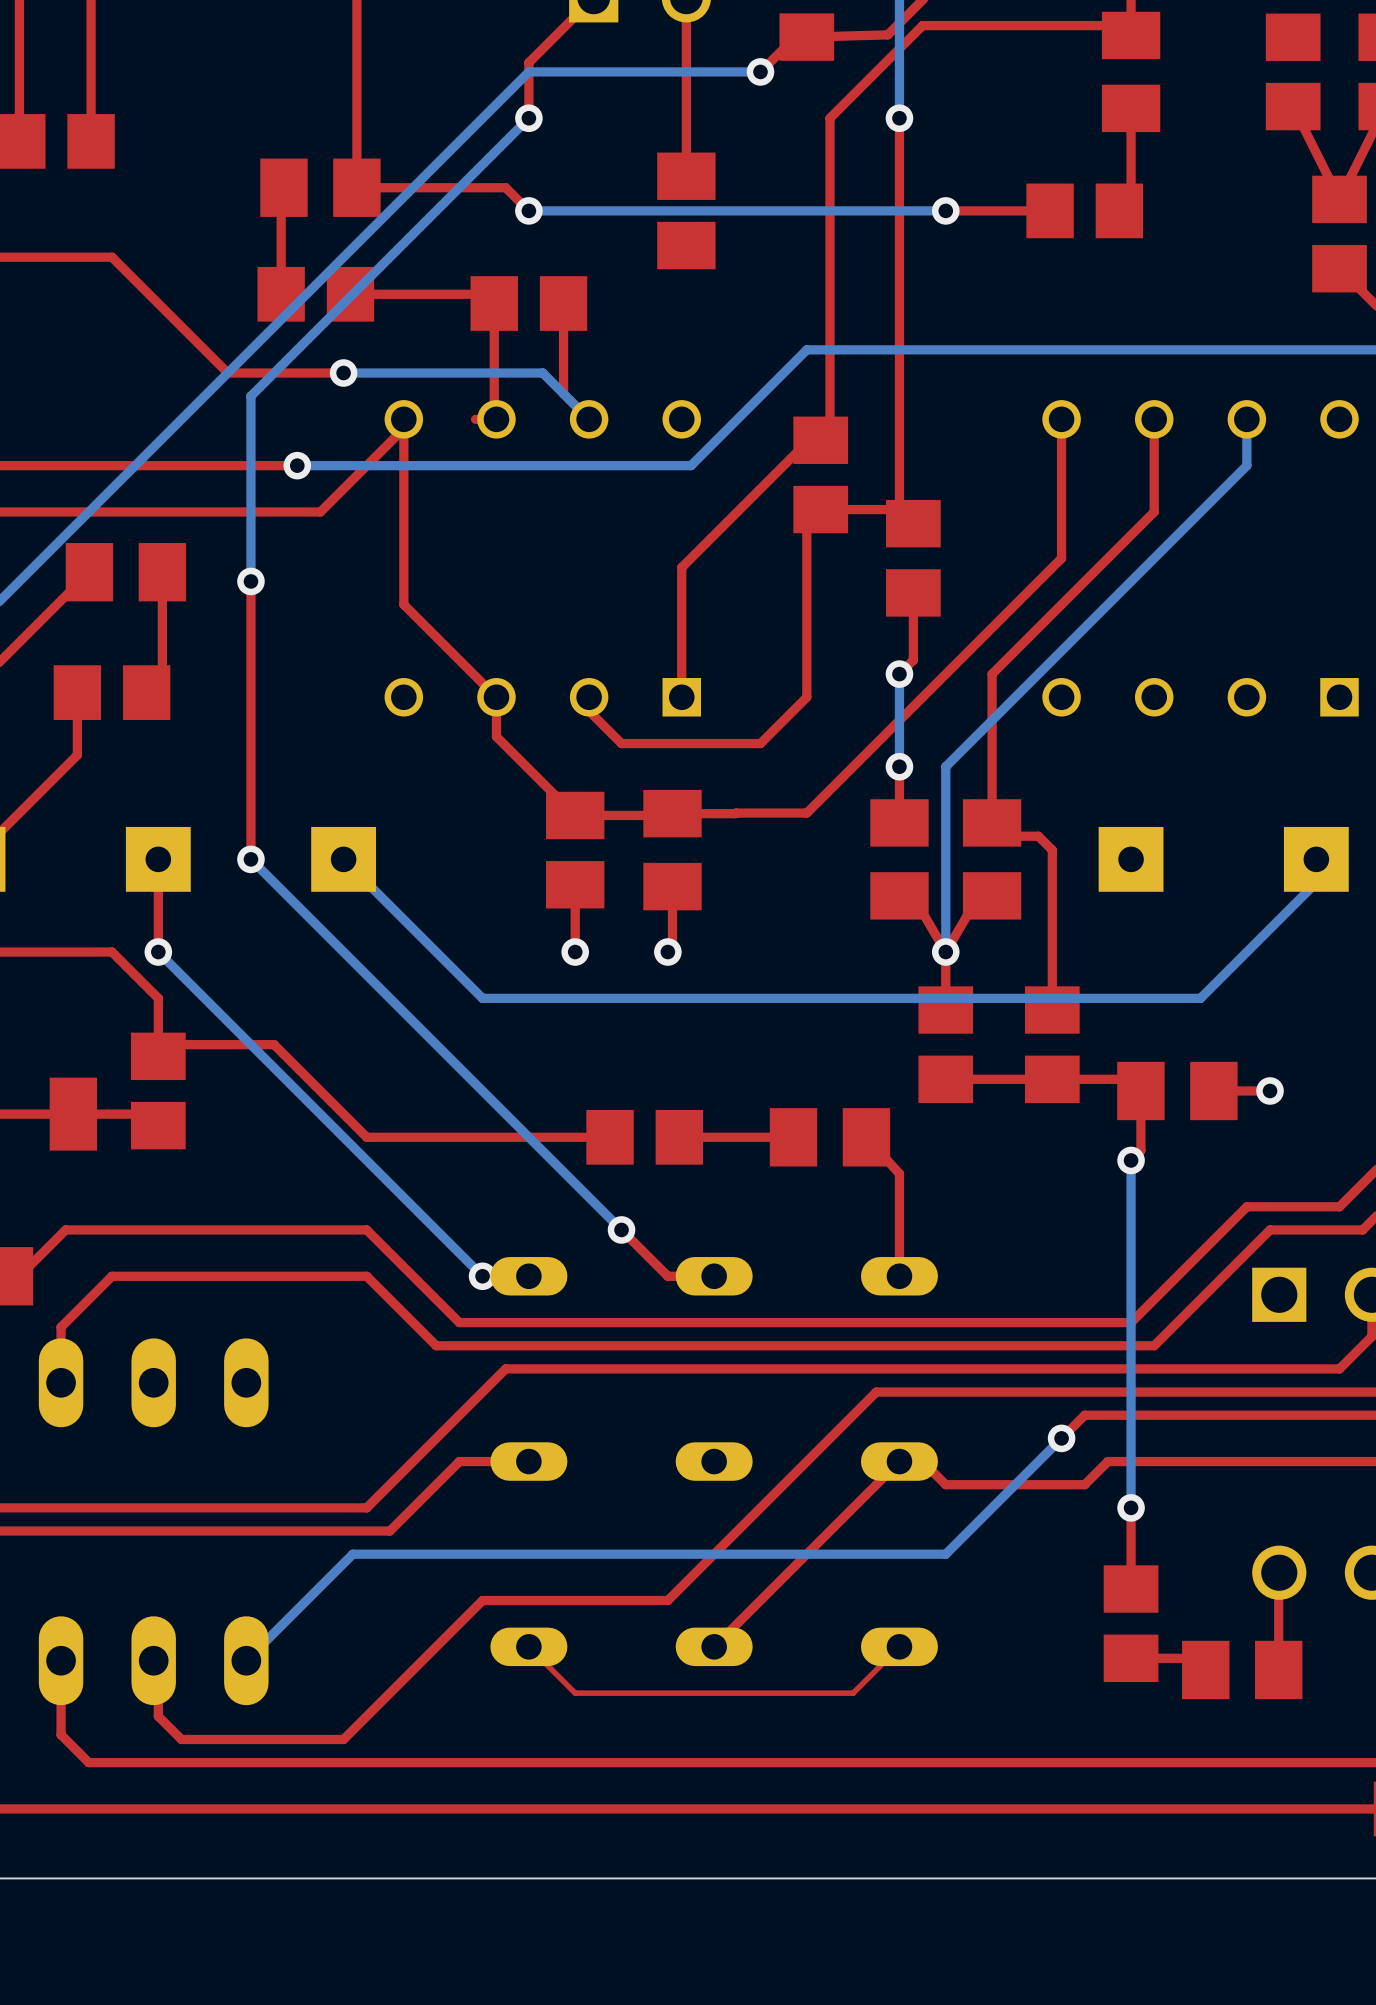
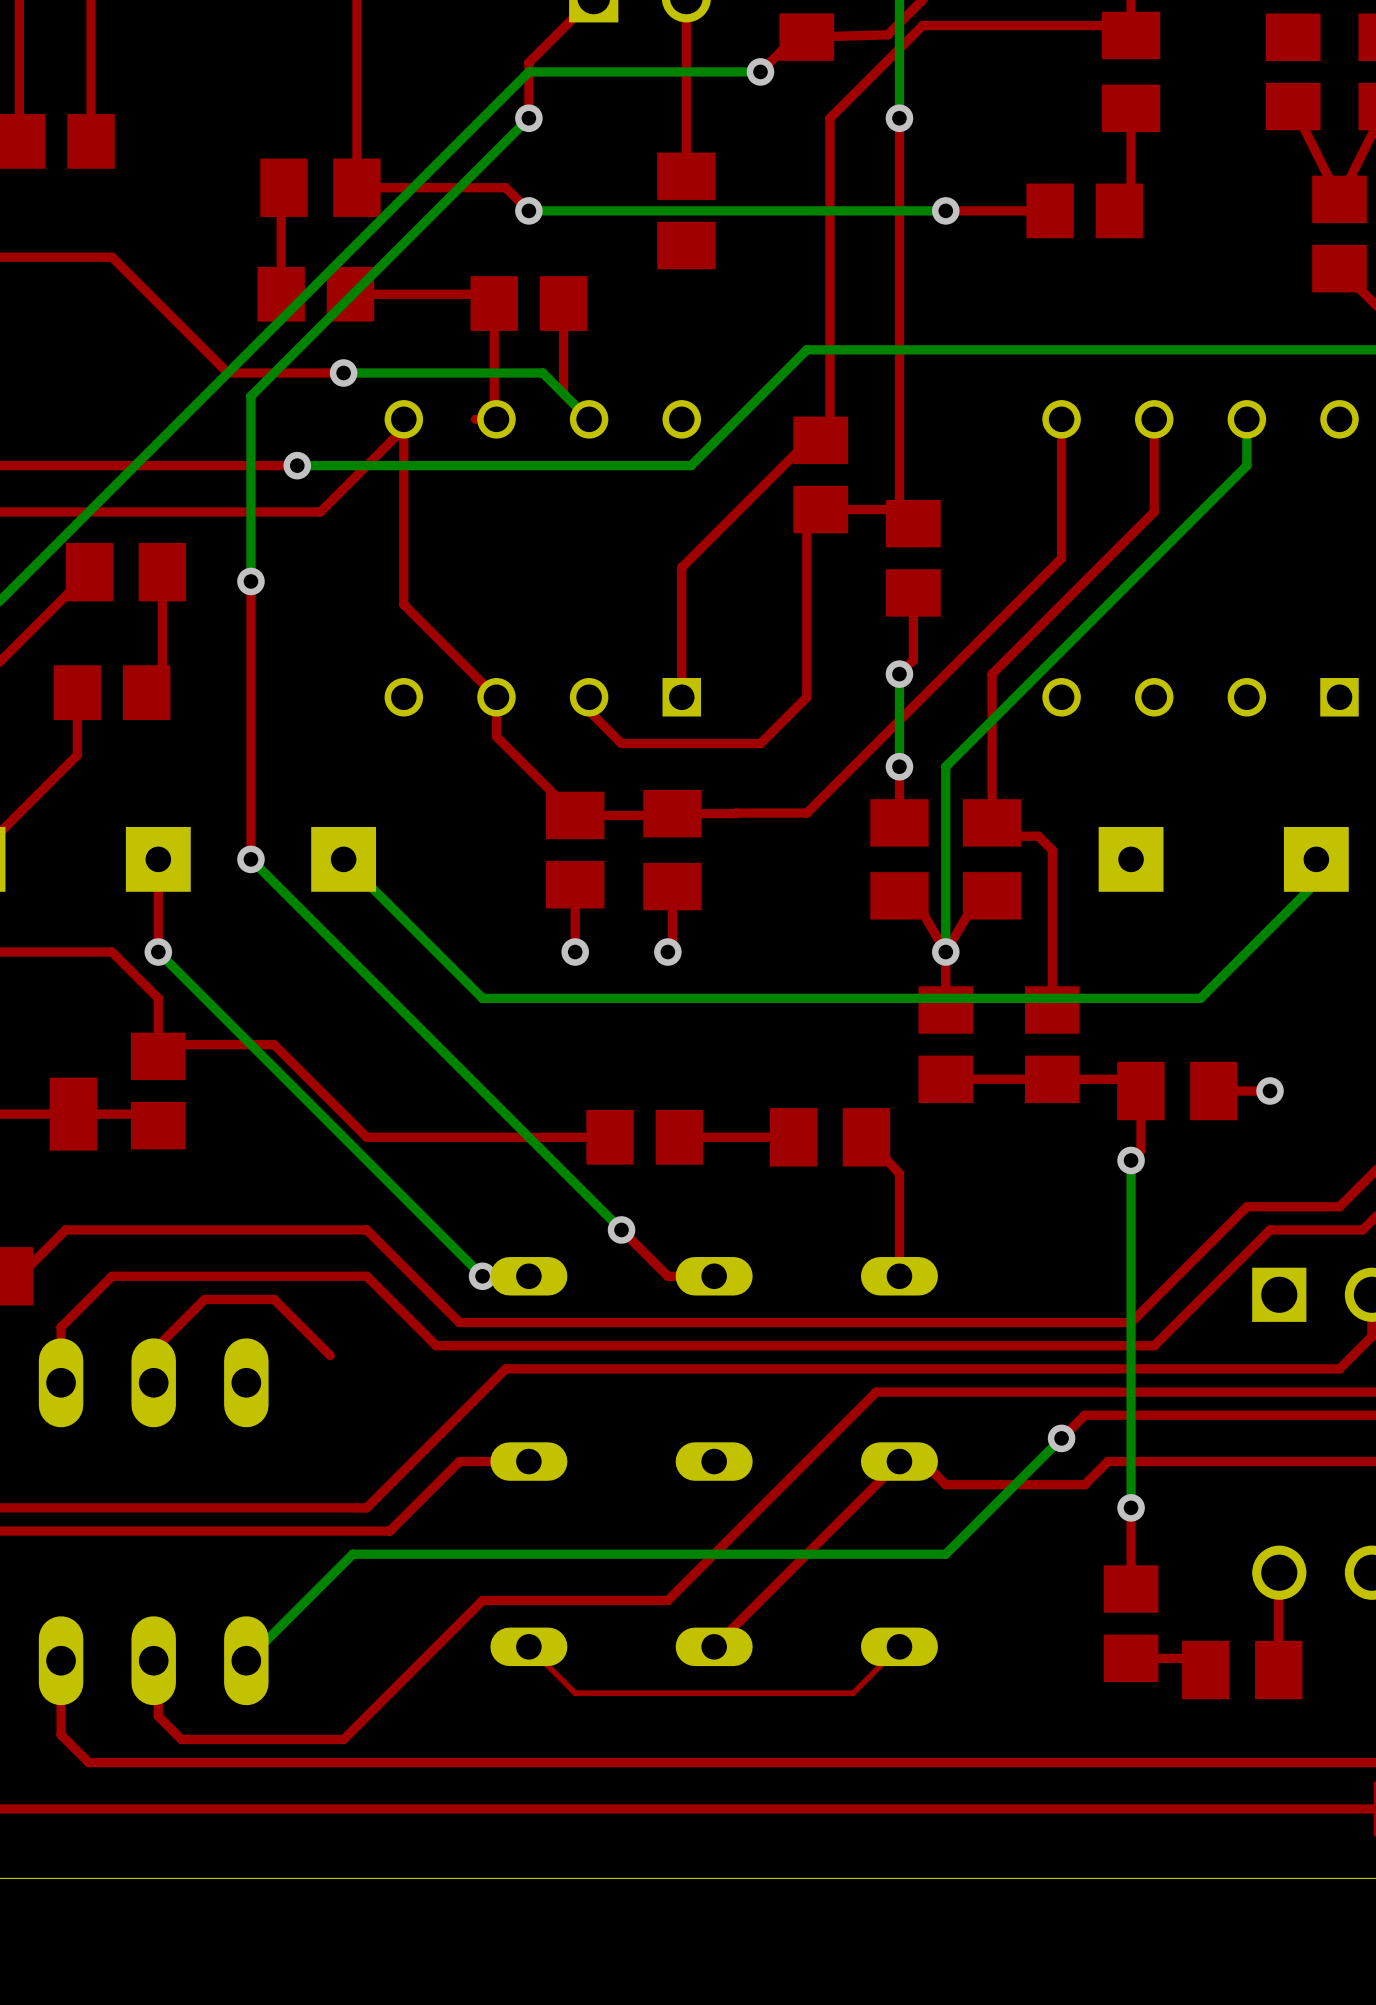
top track: none -> (330, 1355) (274, 1299) (204, 1299) (153, 1350) (153, 1382)

